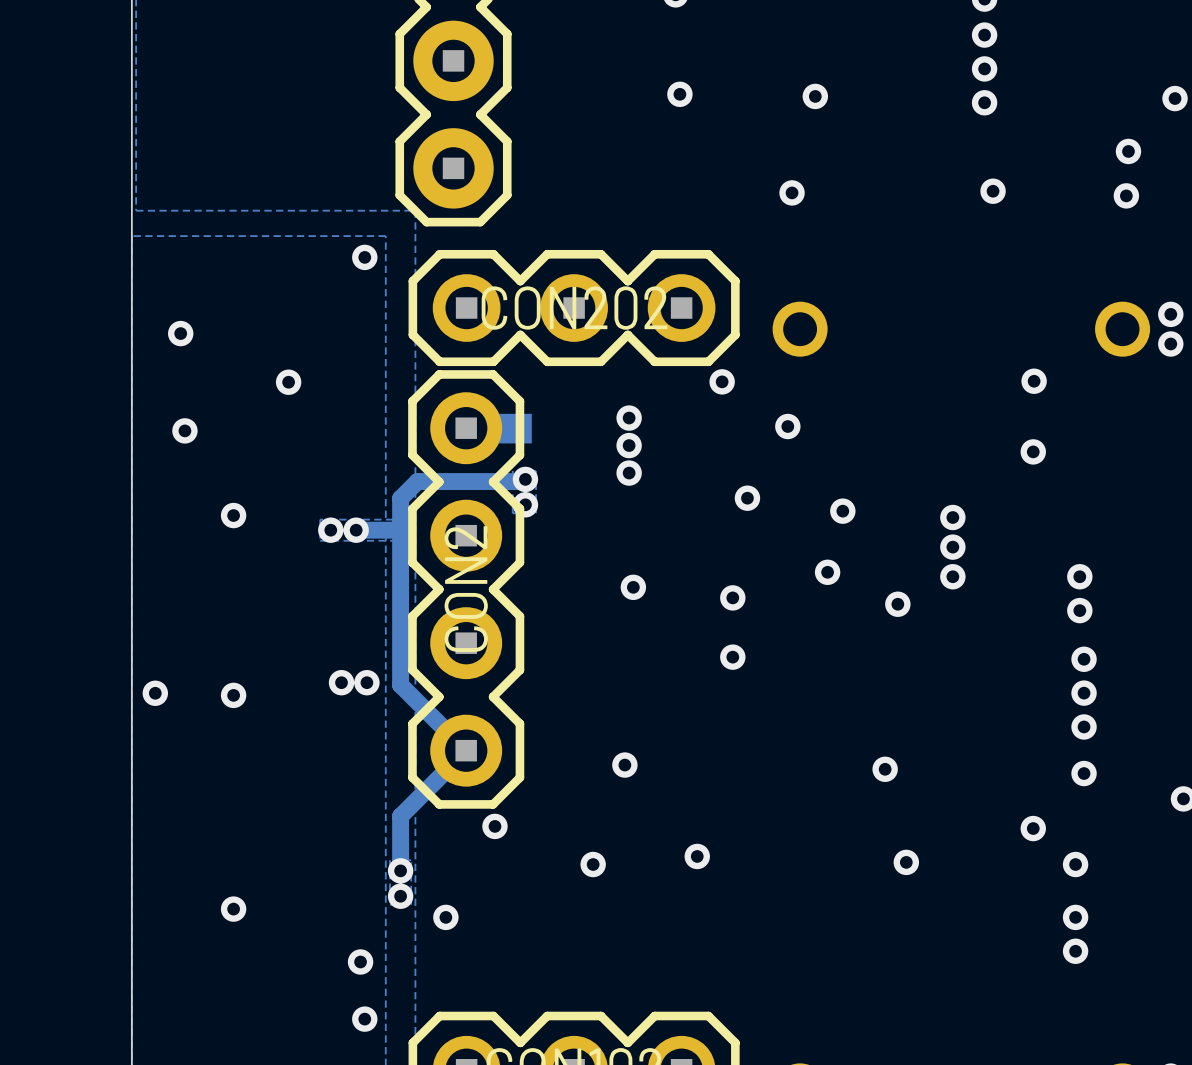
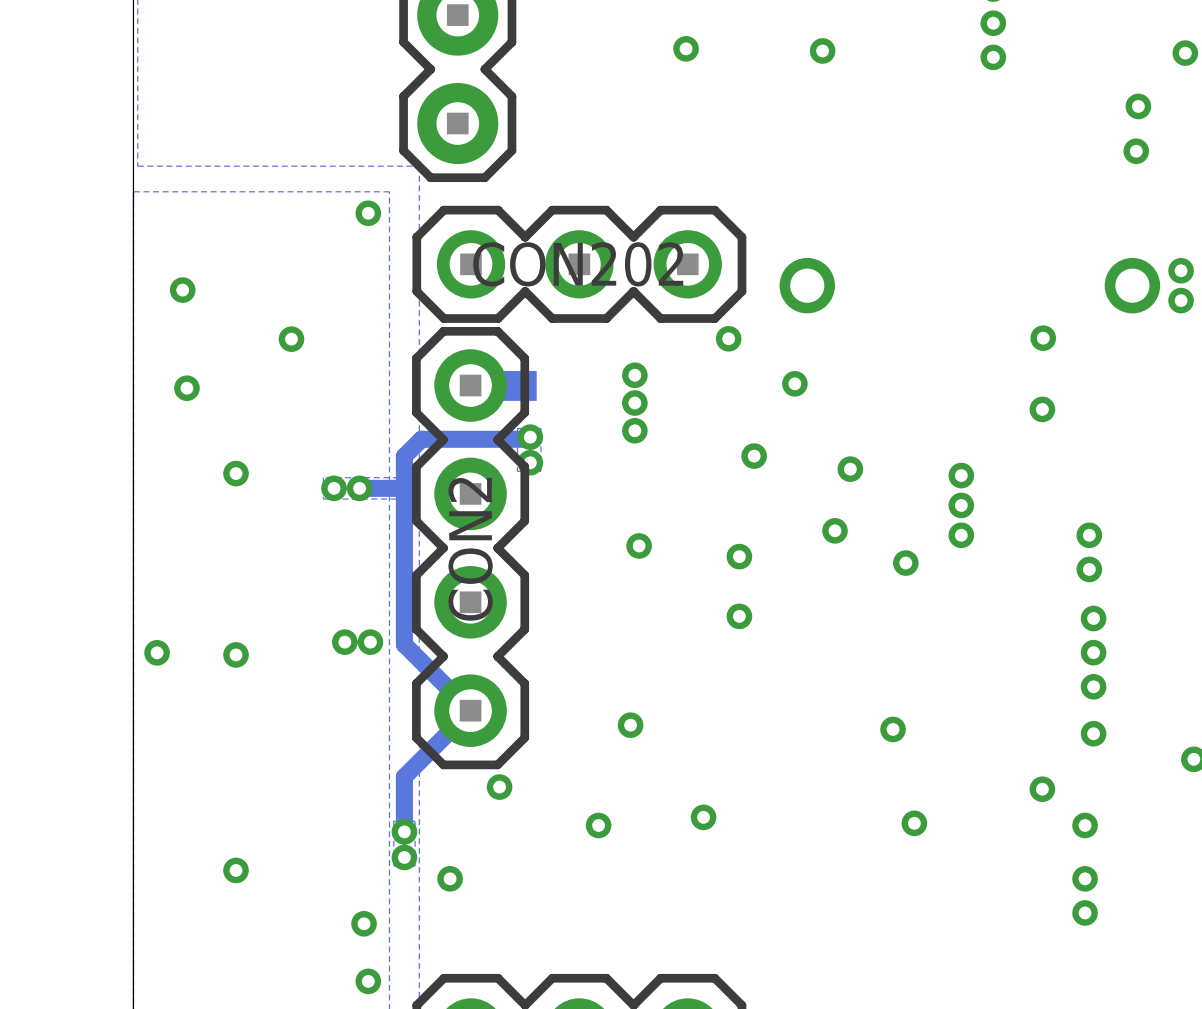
via: (993, 191) -> none
via: (792, 192) -> none

